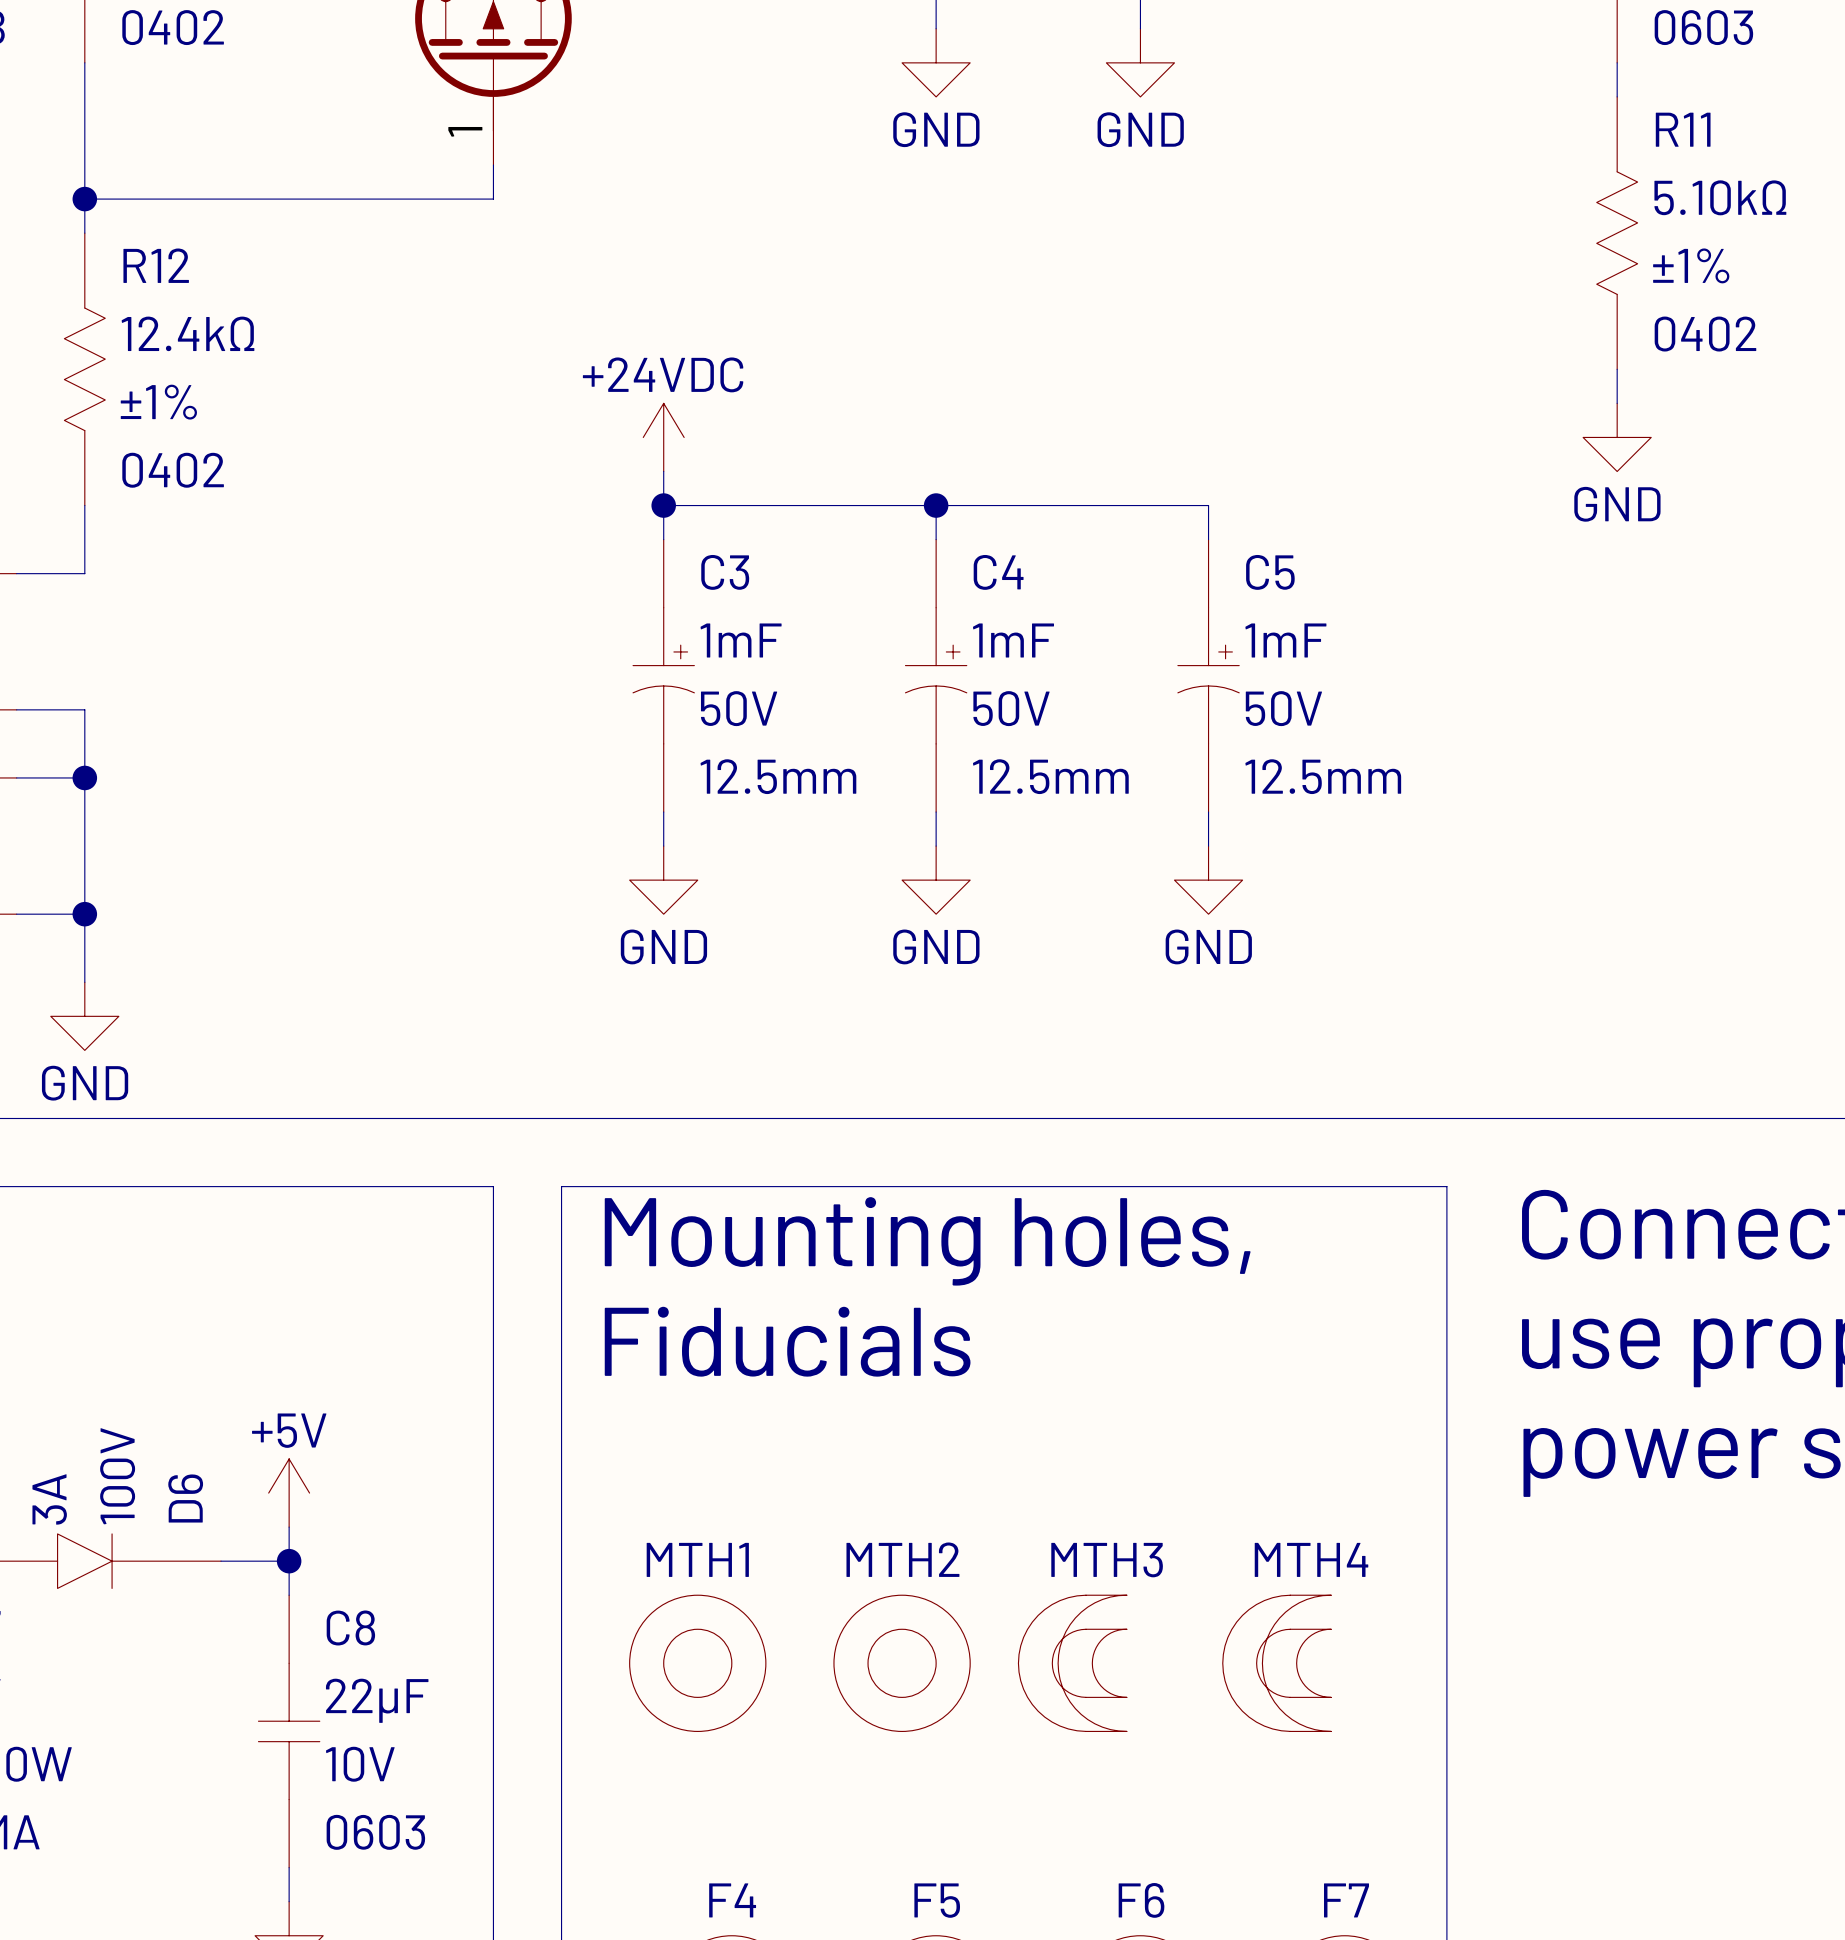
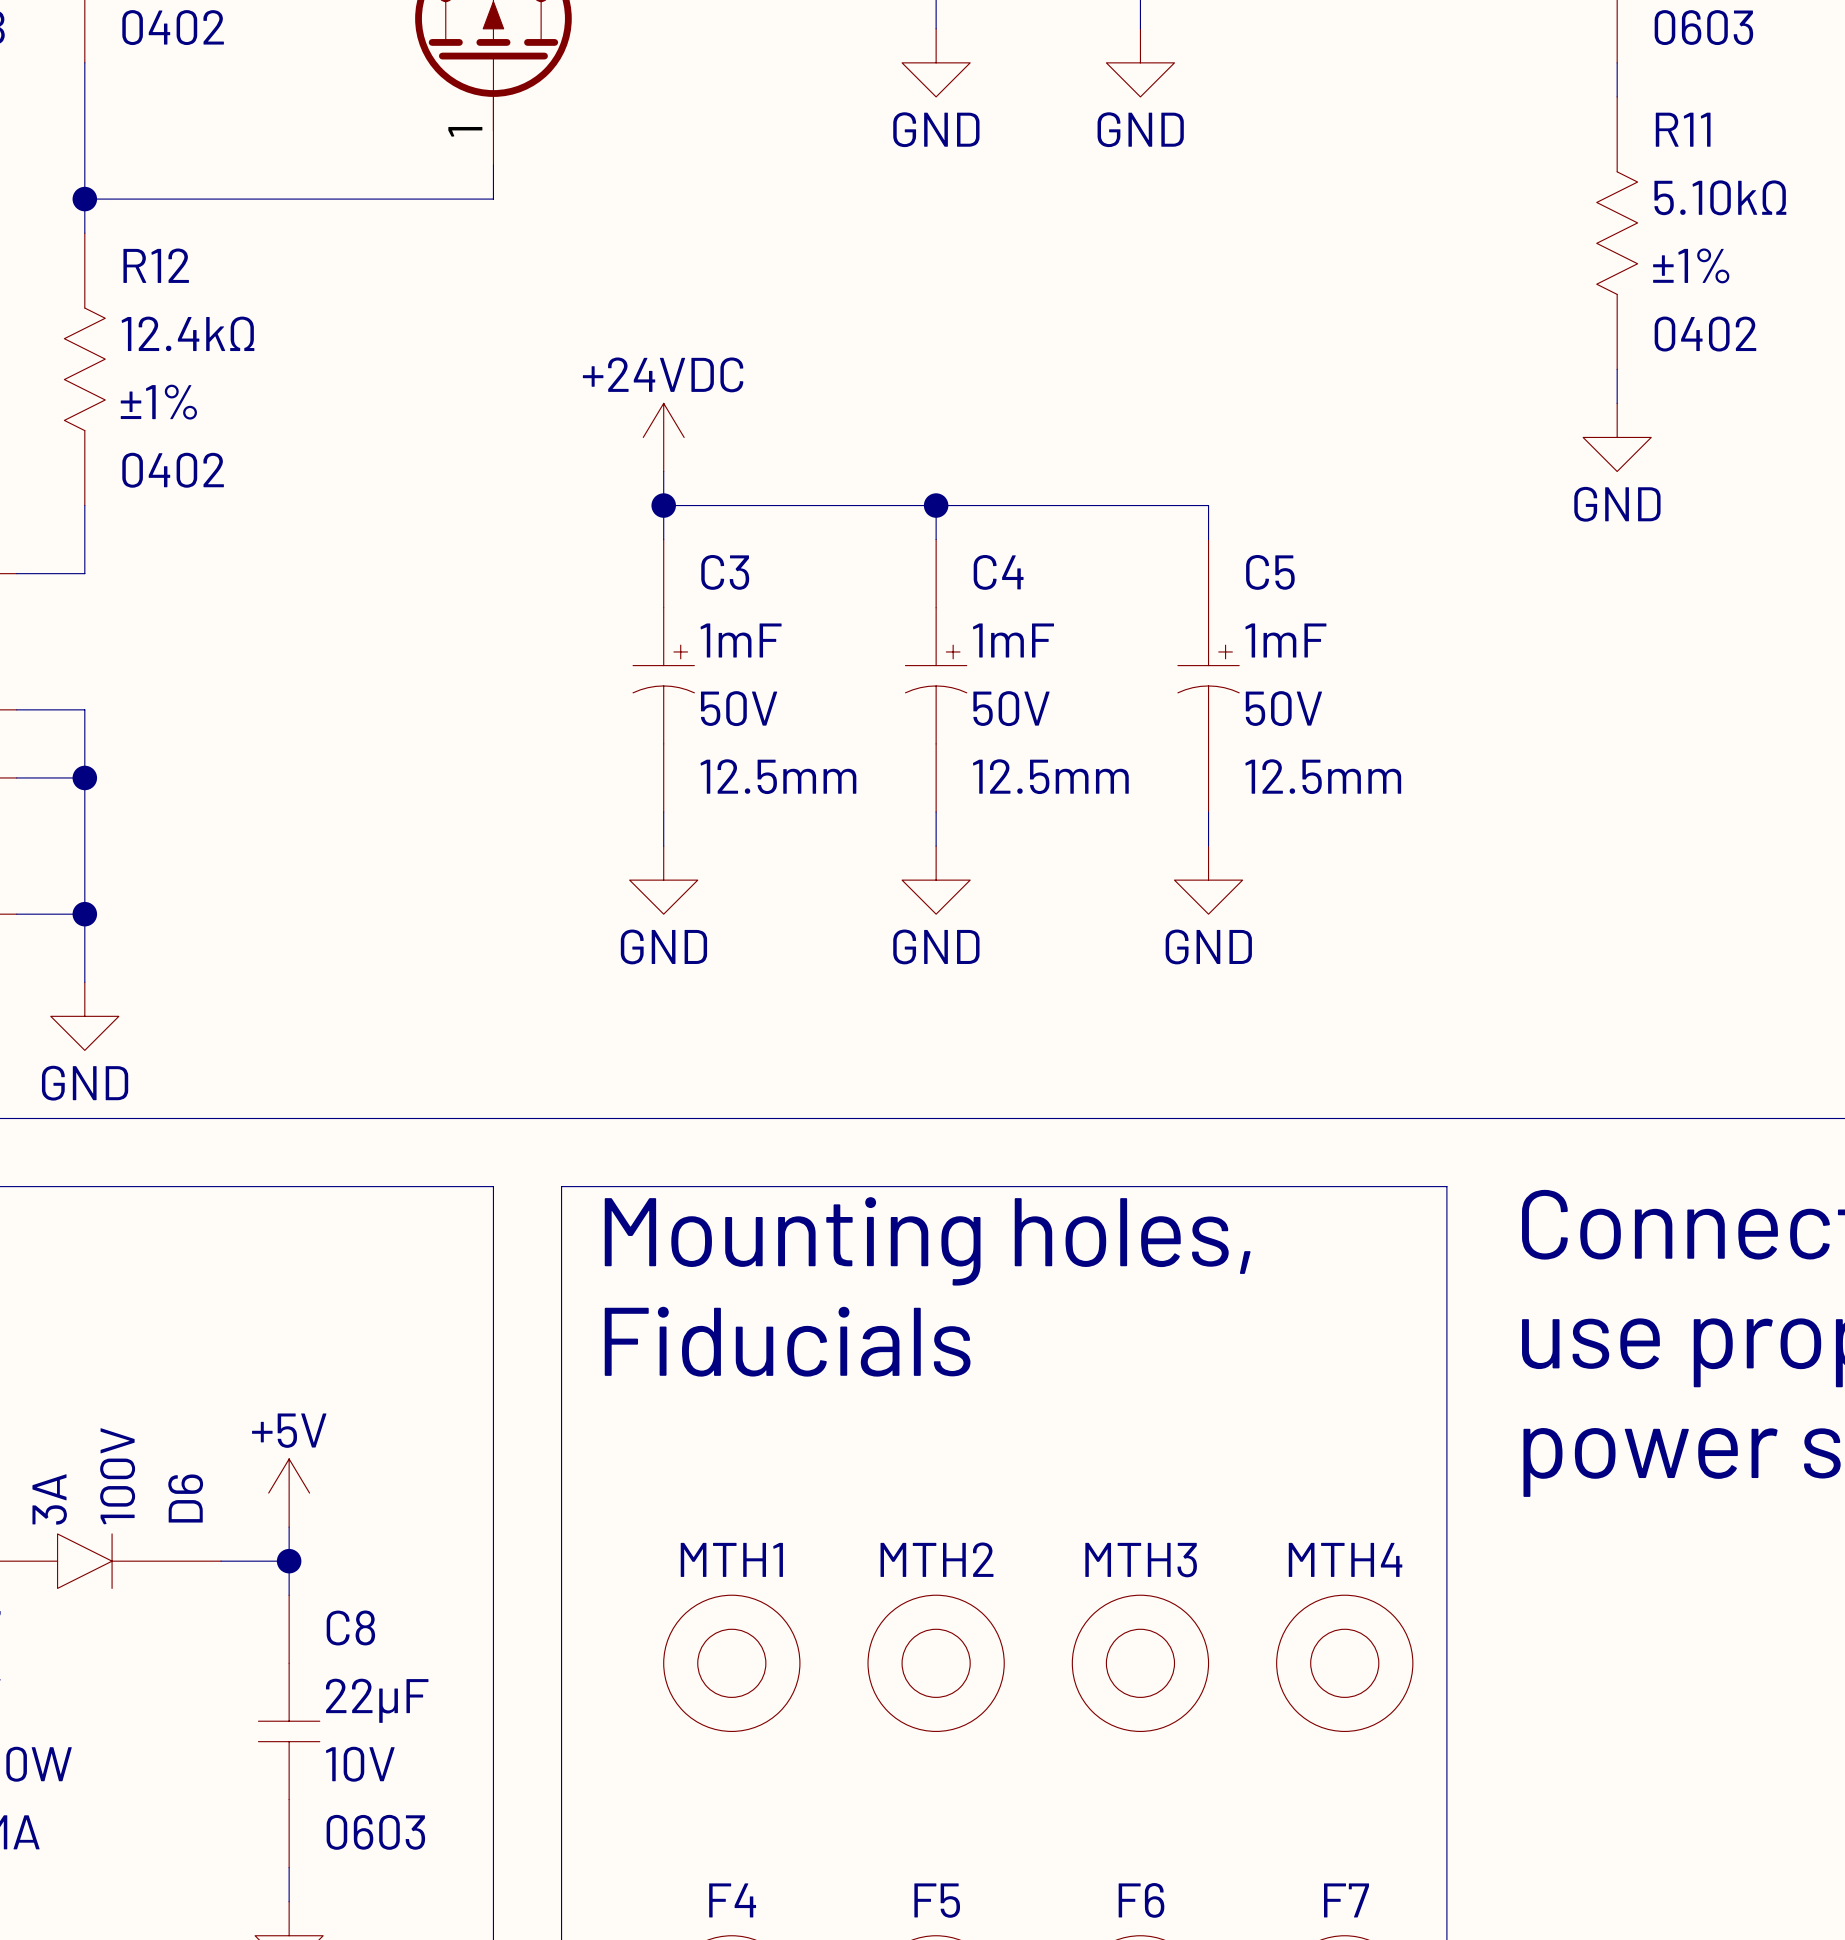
MTH3 symbol: [1018, 1595, 1127, 1732] -> [1072, 1595, 1209, 1732]
MTH4 symbol: [1222, 1595, 1332, 1732] -> [1276, 1595, 1413, 1732]
MTH1 position: (697, 1663) -> (731, 1663)
MTH2 position: (902, 1663) -> (936, 1663)

